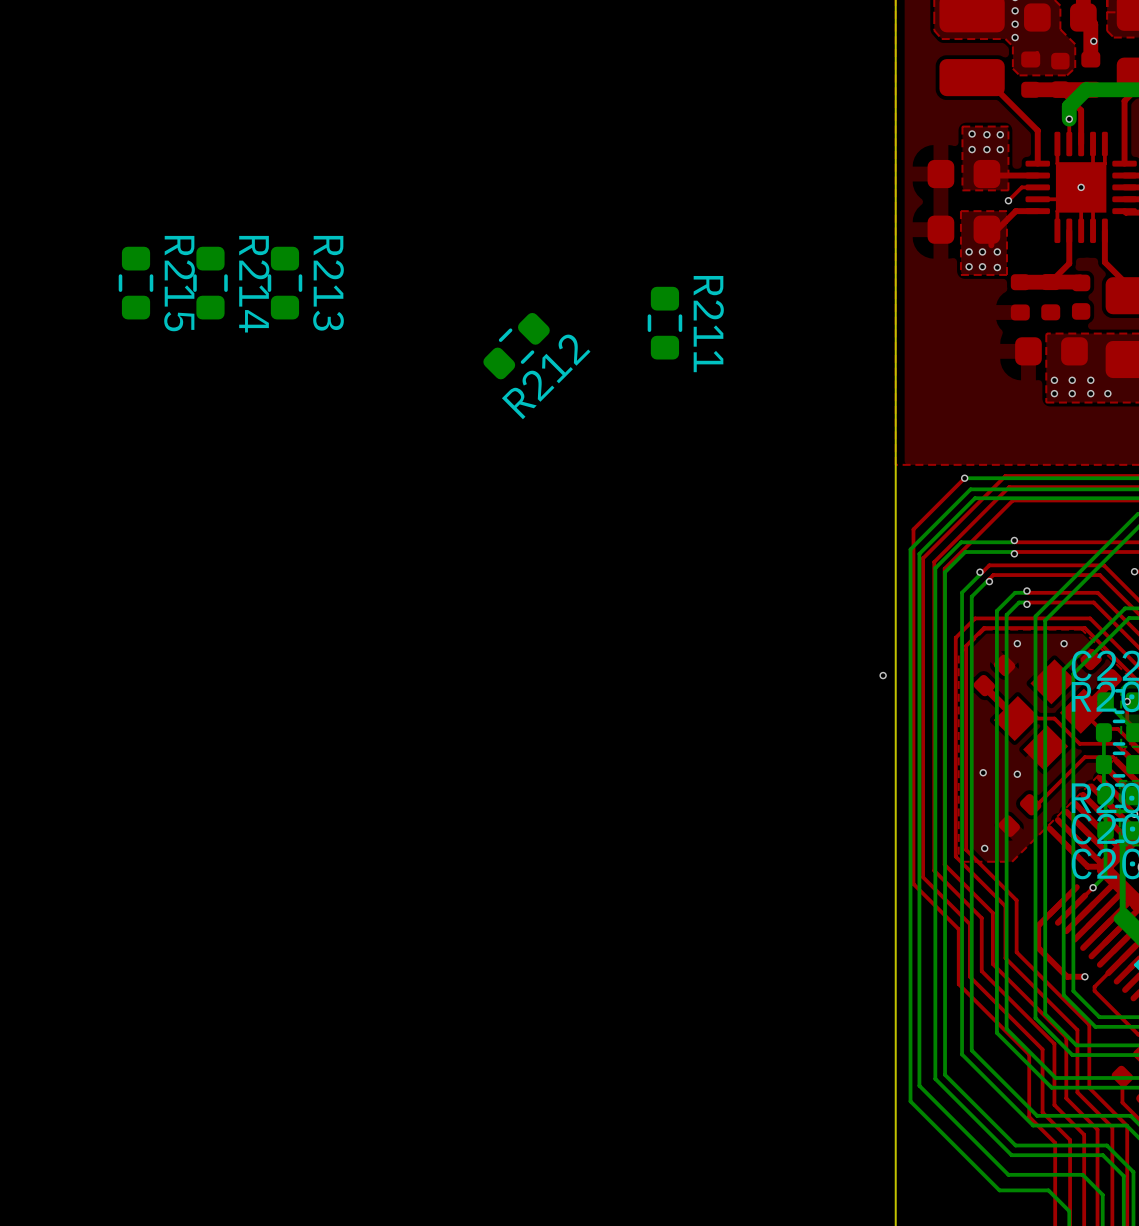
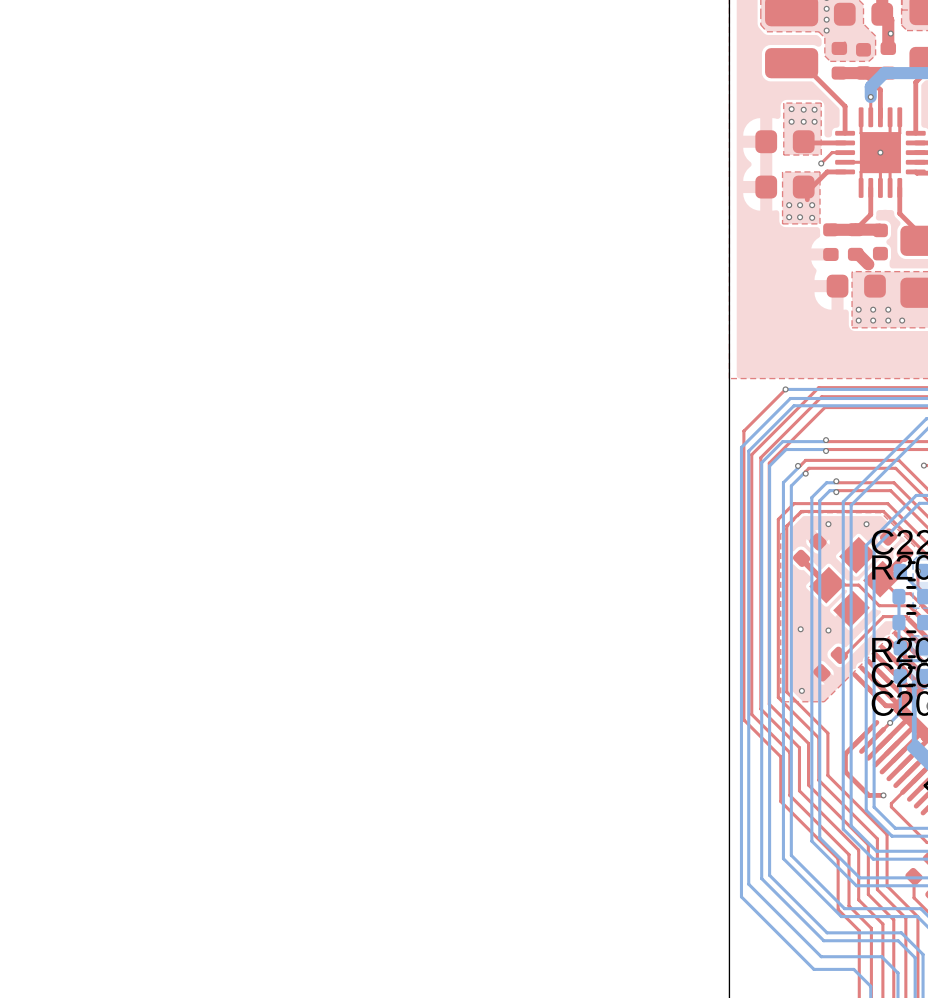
R215: (136, 283) -> none
R214: (210, 283) -> none
R213: (284, 283) -> none
top track: none -> (855, 254) (858, 254) (868, 264)
R211: (664, 323) -> none
R212: (516, 346) -> none
via: (883, 675) -> none

